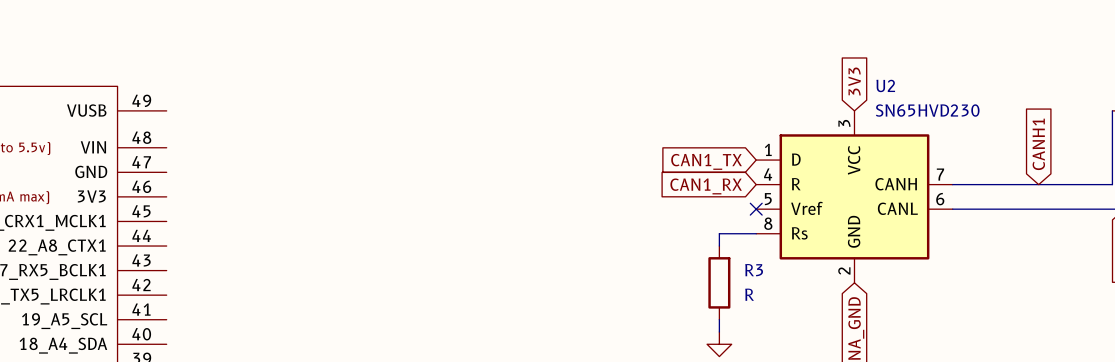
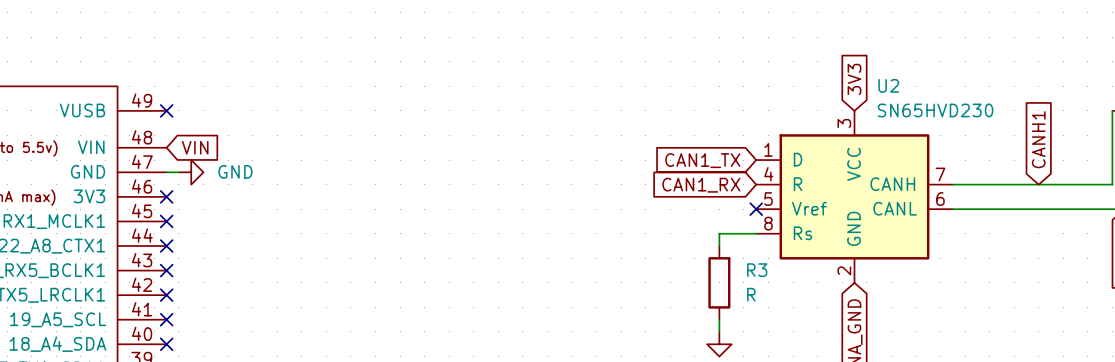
no-connect mark: none -> (166, 110)
global label: none -> VIN (195, 147)
wire: none -> (166, 172) (178, 172)
power symbol: none -> GND (191, 172)
no-connect mark: none -> (166, 196)
no-connect mark: none -> (166, 221)
no-connect mark: none -> (166, 246)
no-connect mark: none -> (166, 270)
no-connect mark: none -> (166, 295)
no-connect mark: none -> (166, 319)
no-connect mark: none -> (166, 344)

